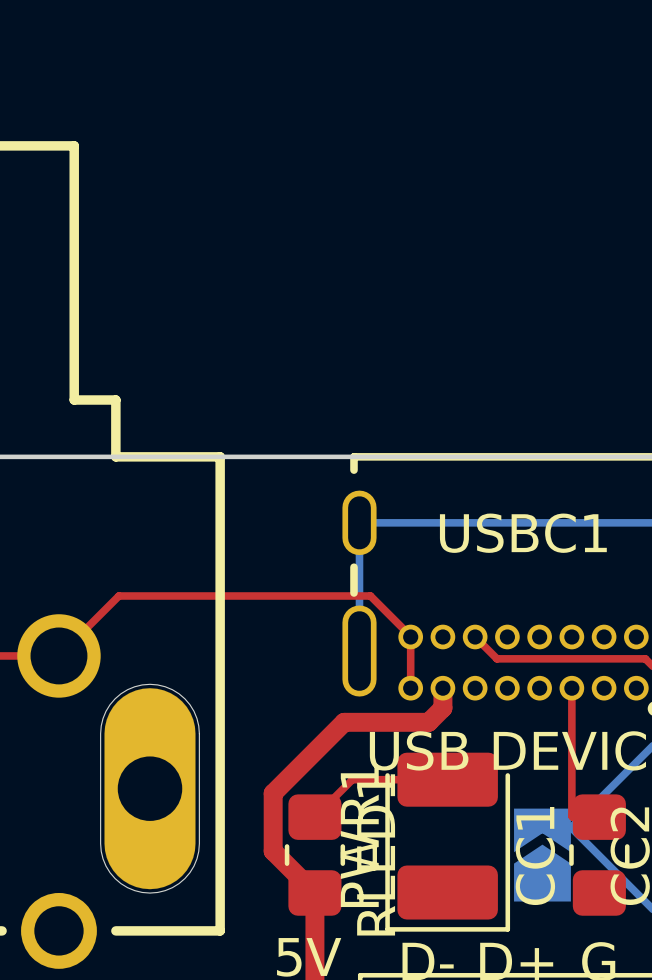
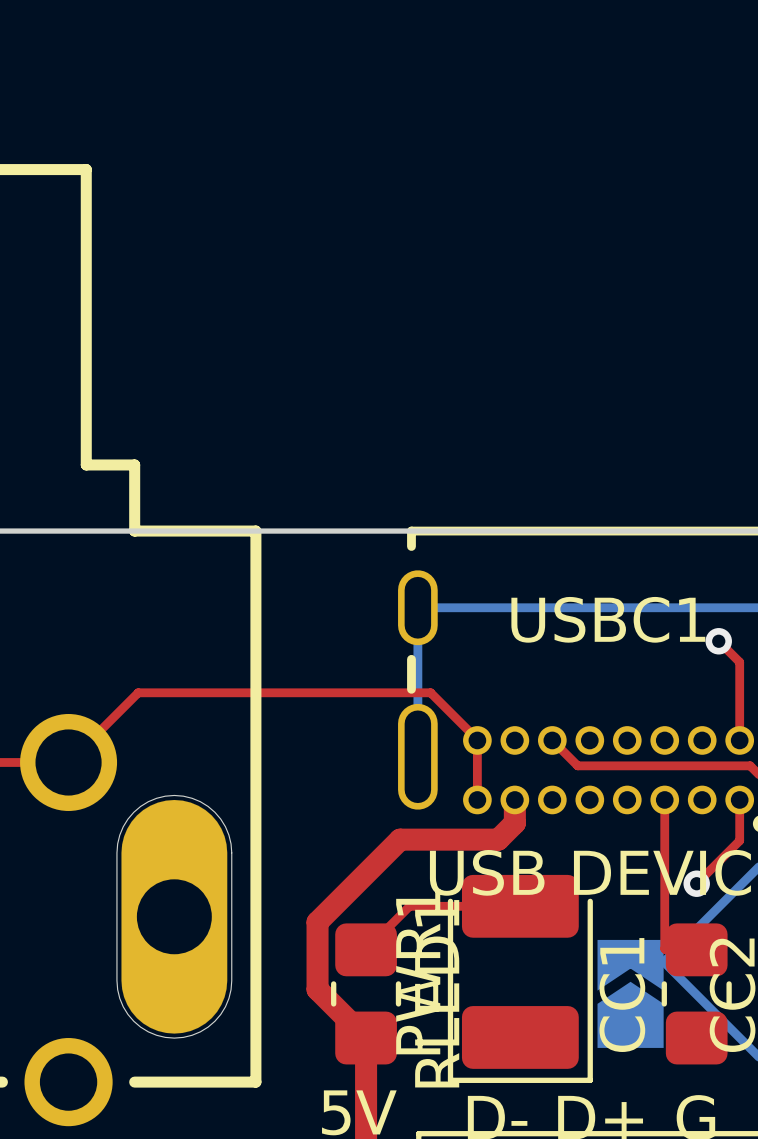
top track: none -> (718, 641) (739, 662) (739, 740)
via: none -> (718, 641)
top track: none -> (739, 799) (739, 840) (696, 883)
via: none -> (696, 883)

